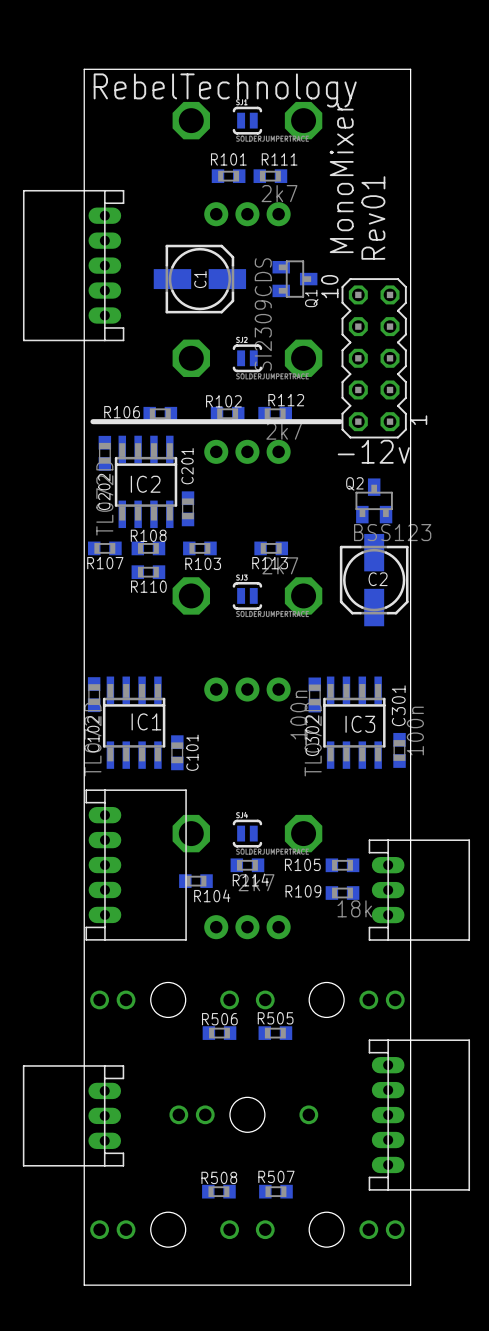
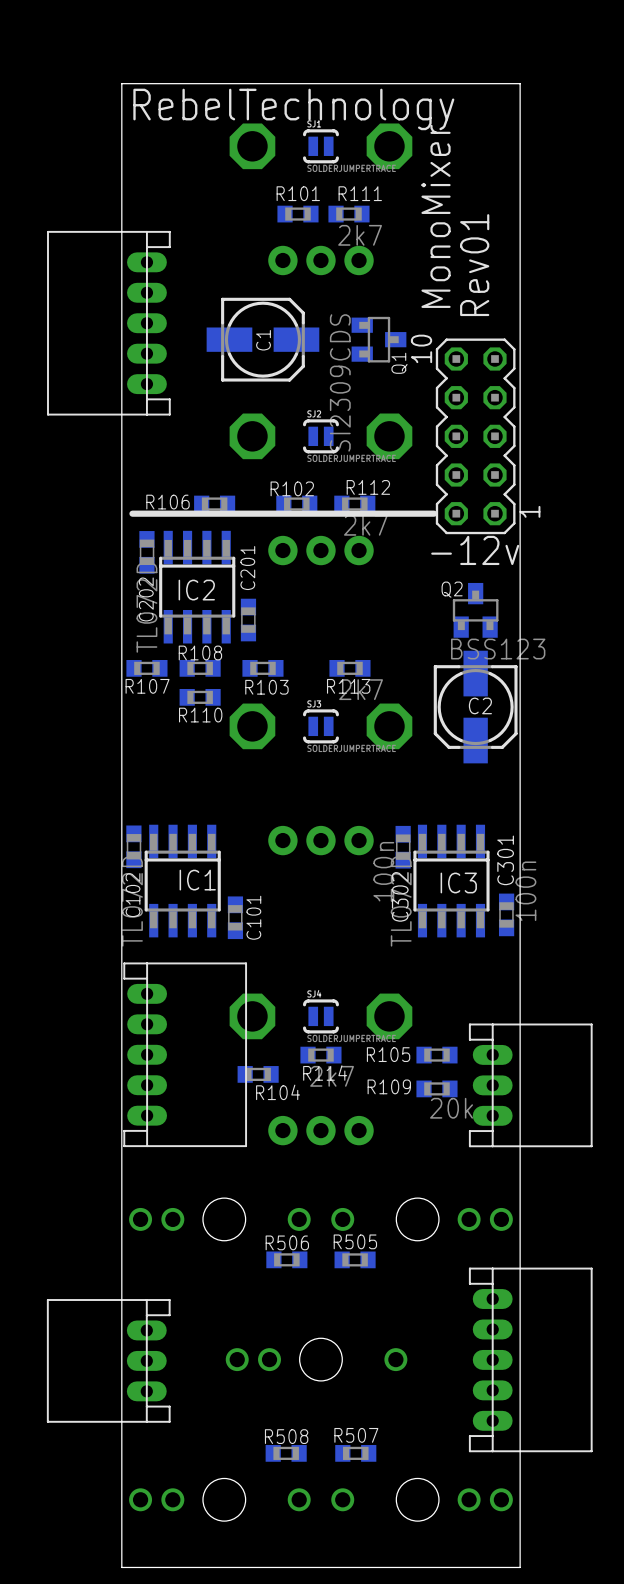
R109 value: 18k (354, 908) -> 20k (451, 1108)

